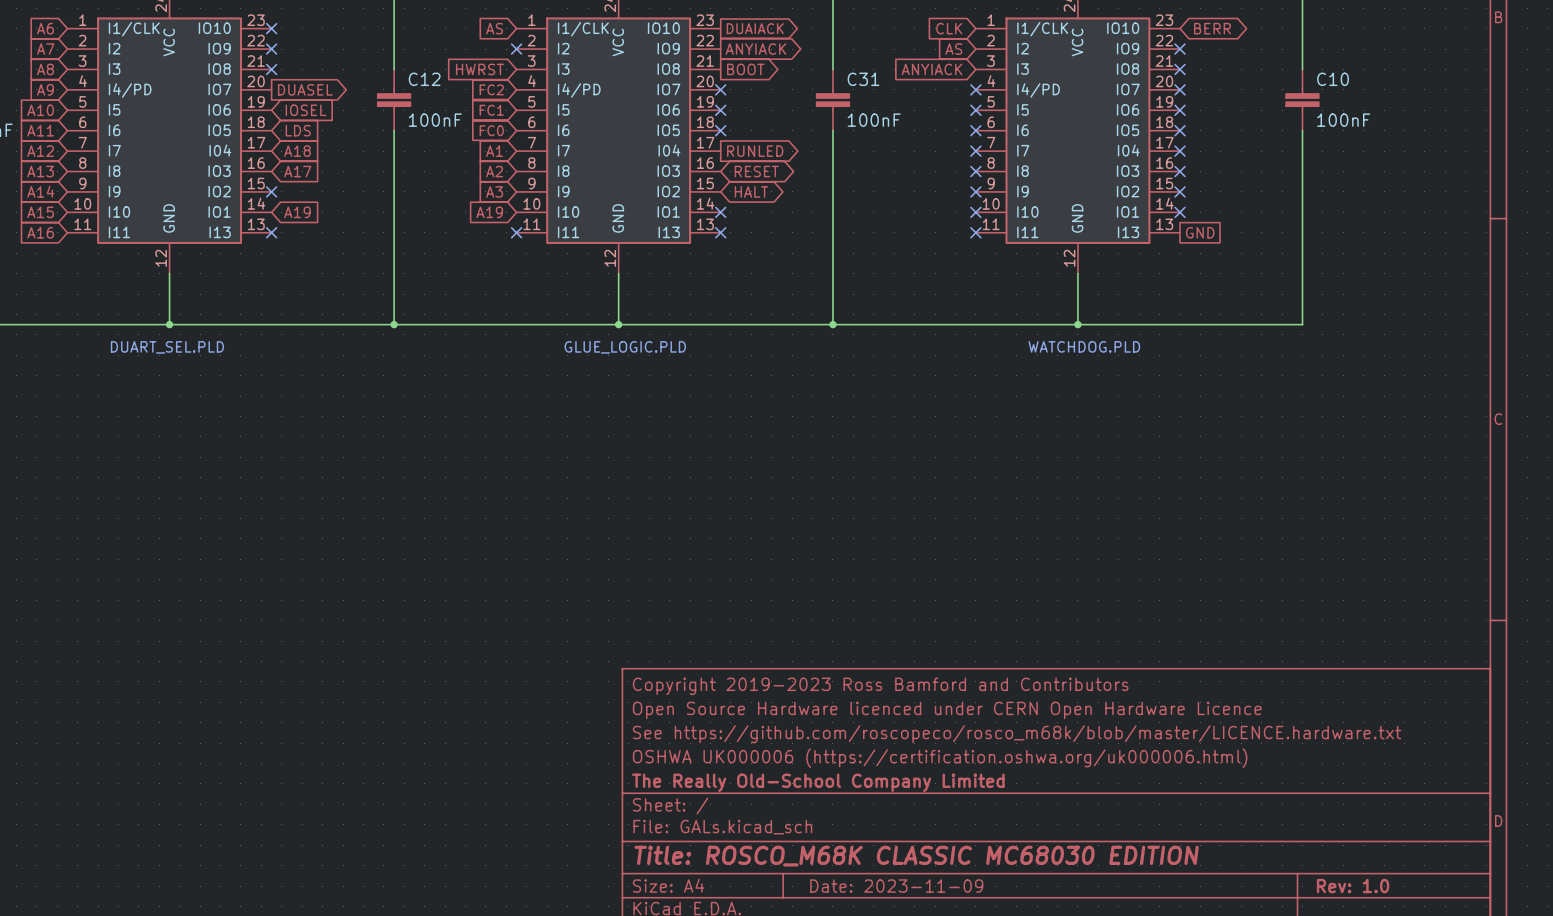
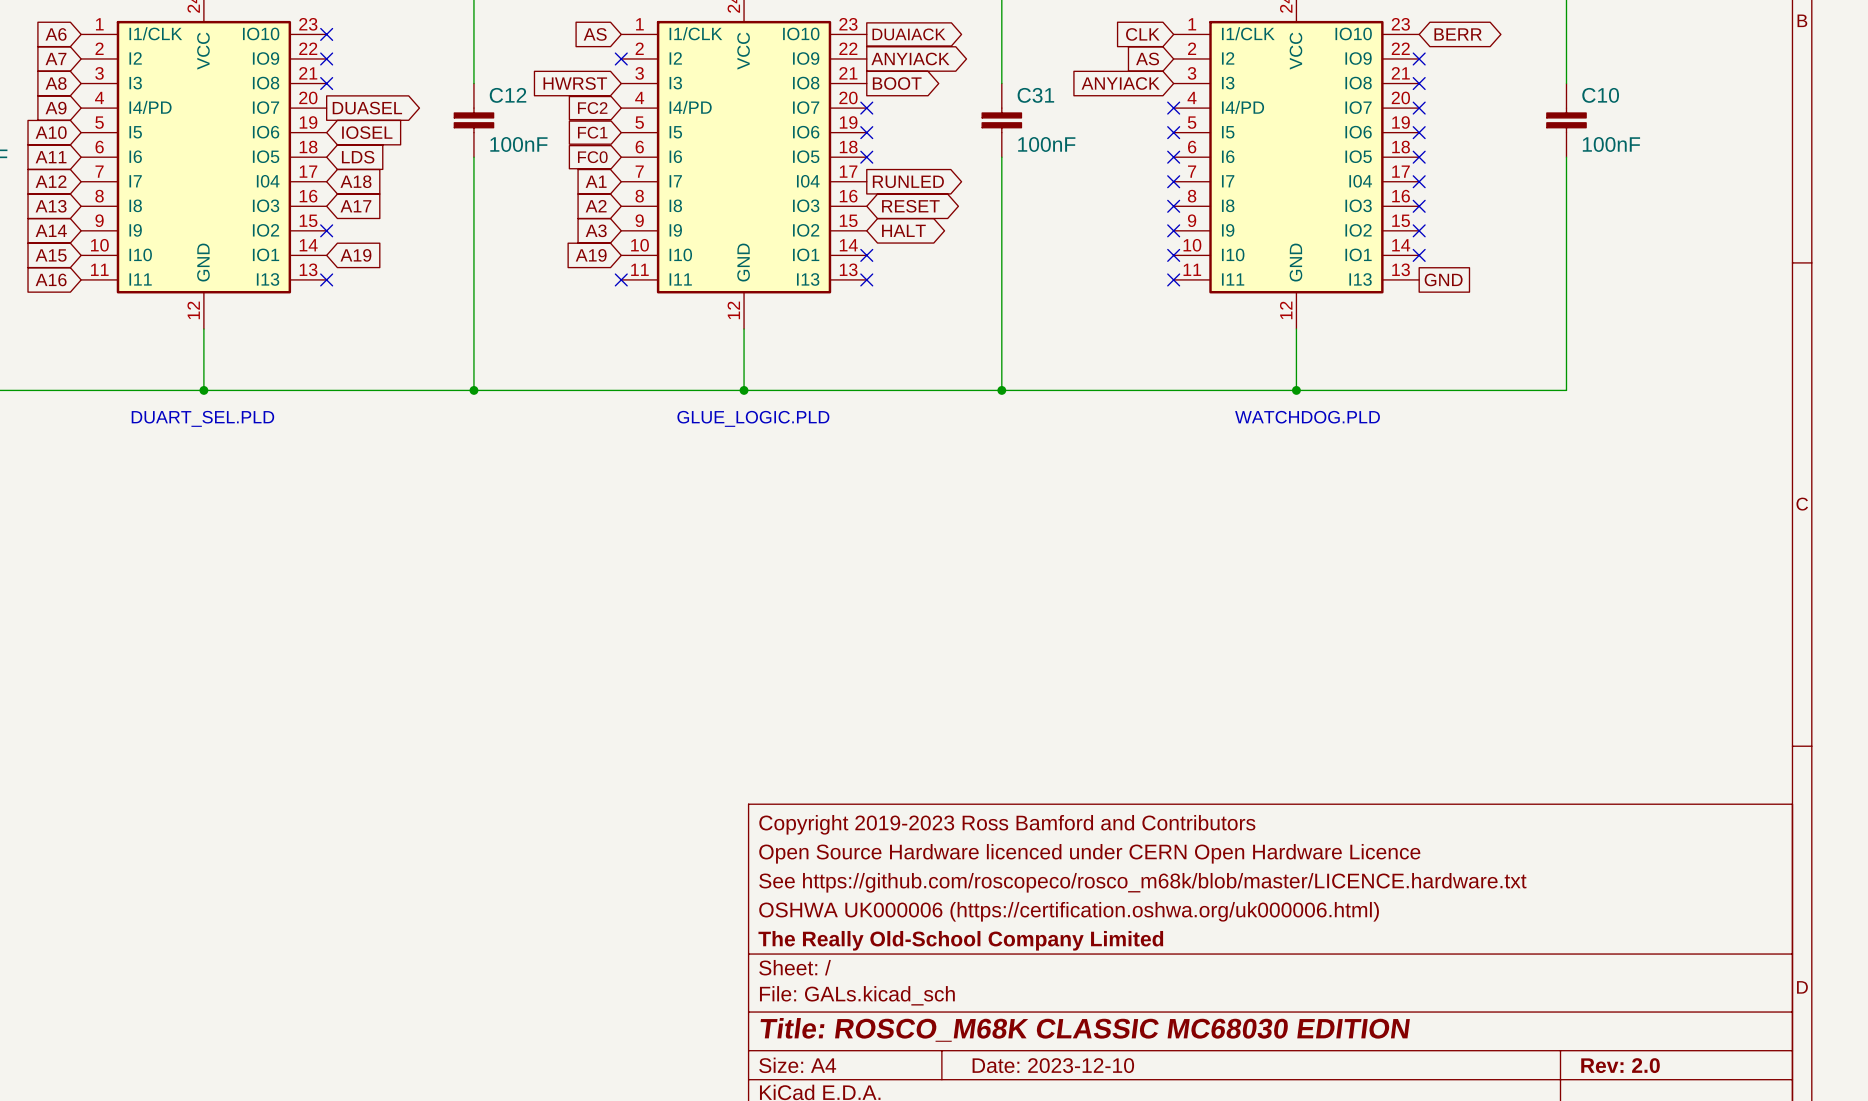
title block: Date: 2023-11-09 (896, 886) -> Date: 2023-12-10 (1053, 1065)
title block: Rev: 1.0 (1353, 886) -> Rev: 2.0 (1620, 1065)

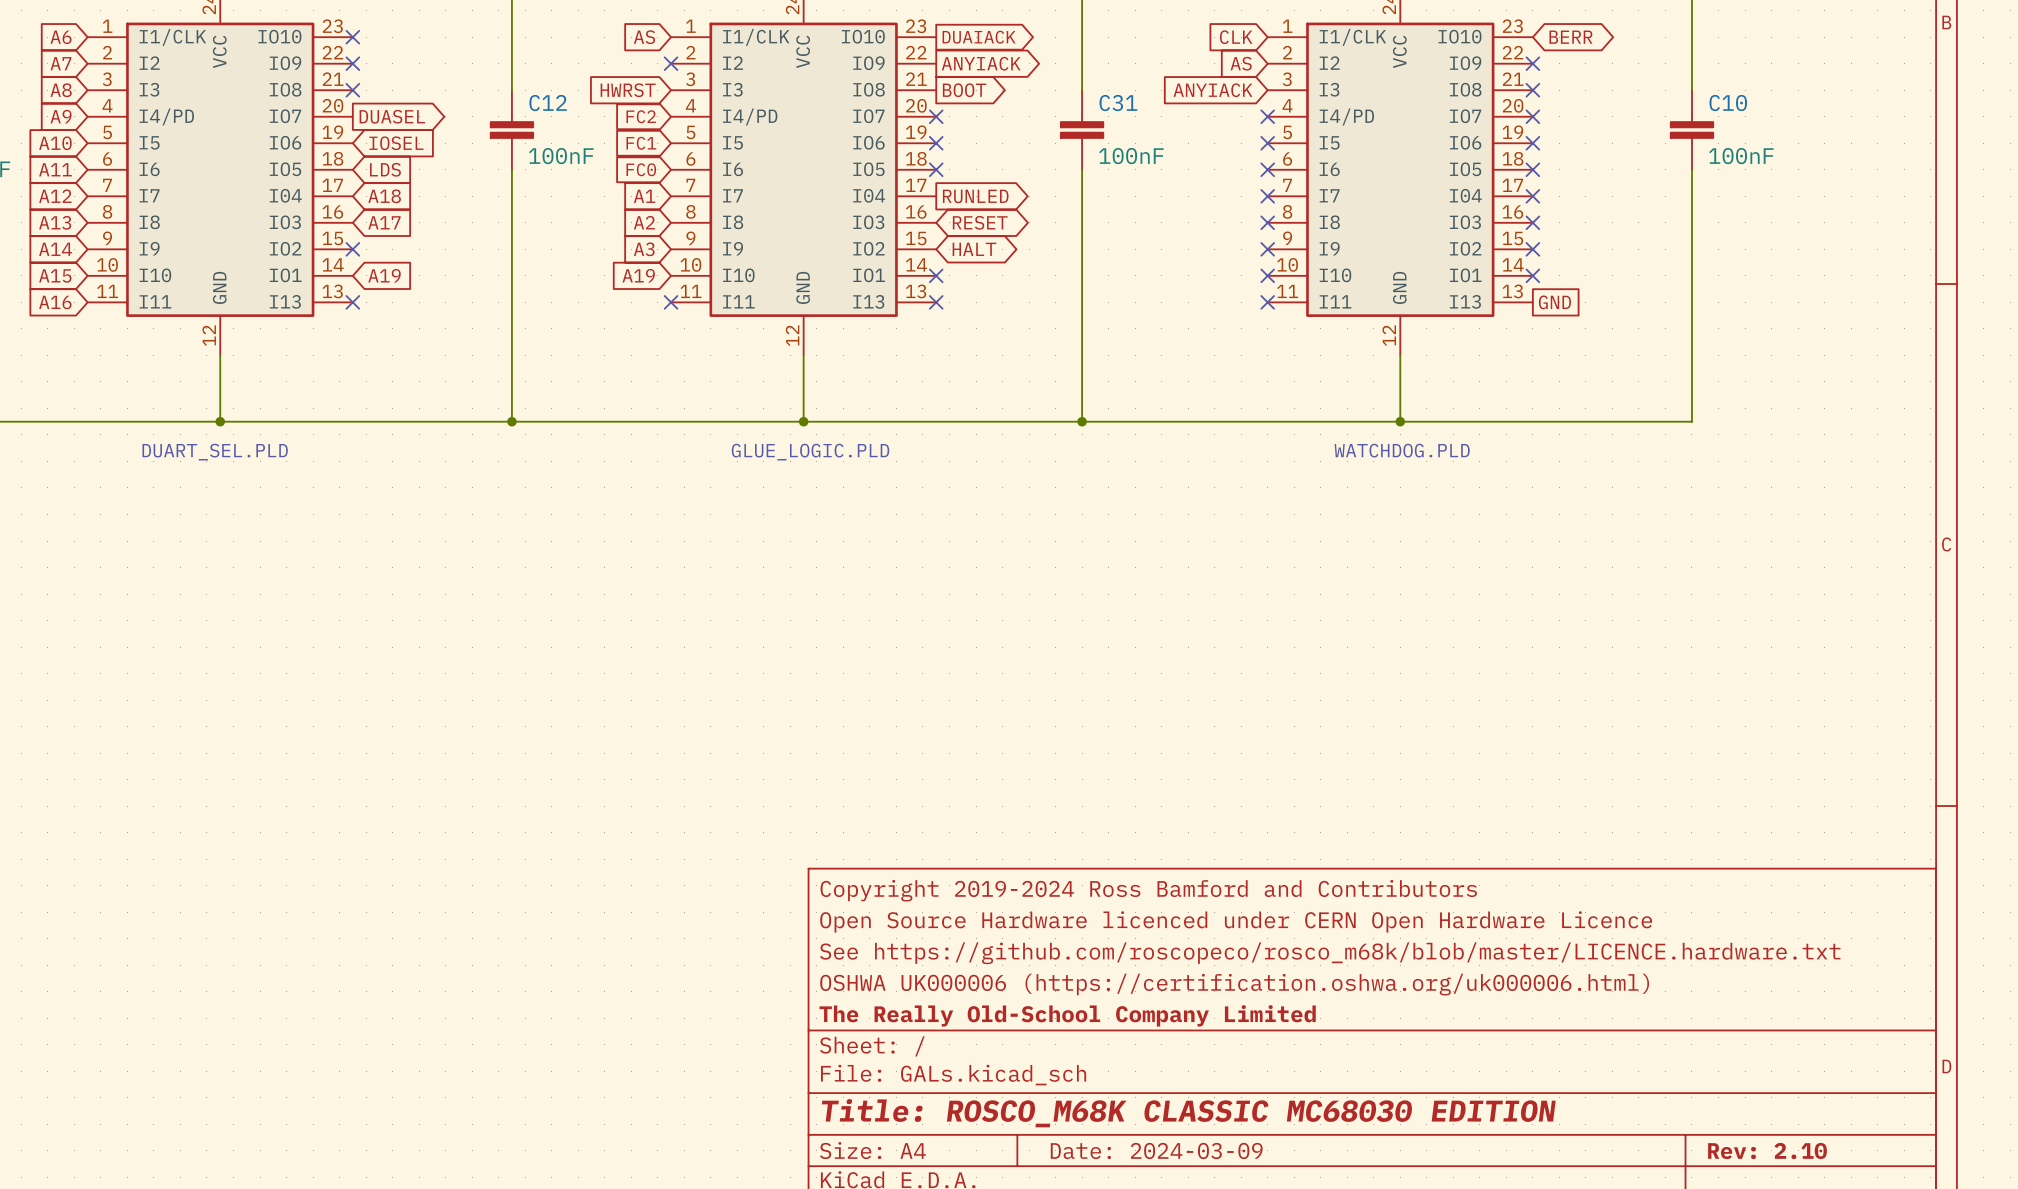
title block: Copyright 2019-2023 Ross Bamford and Contributors (1007, 824) -> Copyright 2019-2024 Ross Bamford and Contributors (1148, 890)
title block: Date: 2023-12-10 (1053, 1065) -> Date: 2024-03-09 (1156, 1150)
title block: Rev: 2.0 (1620, 1065) -> Rev: 2.10 (1767, 1150)

